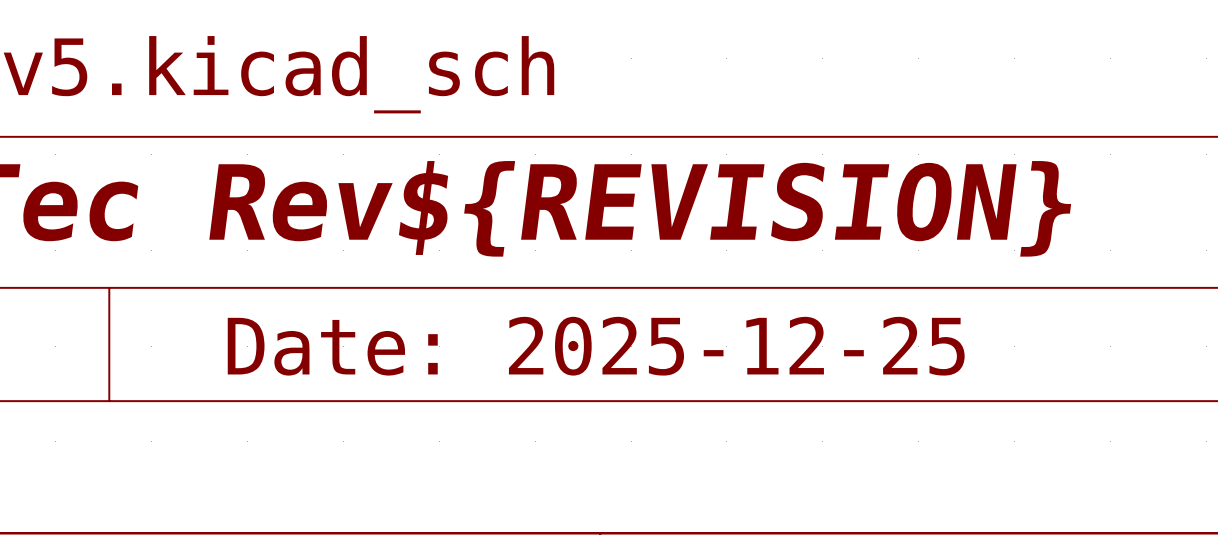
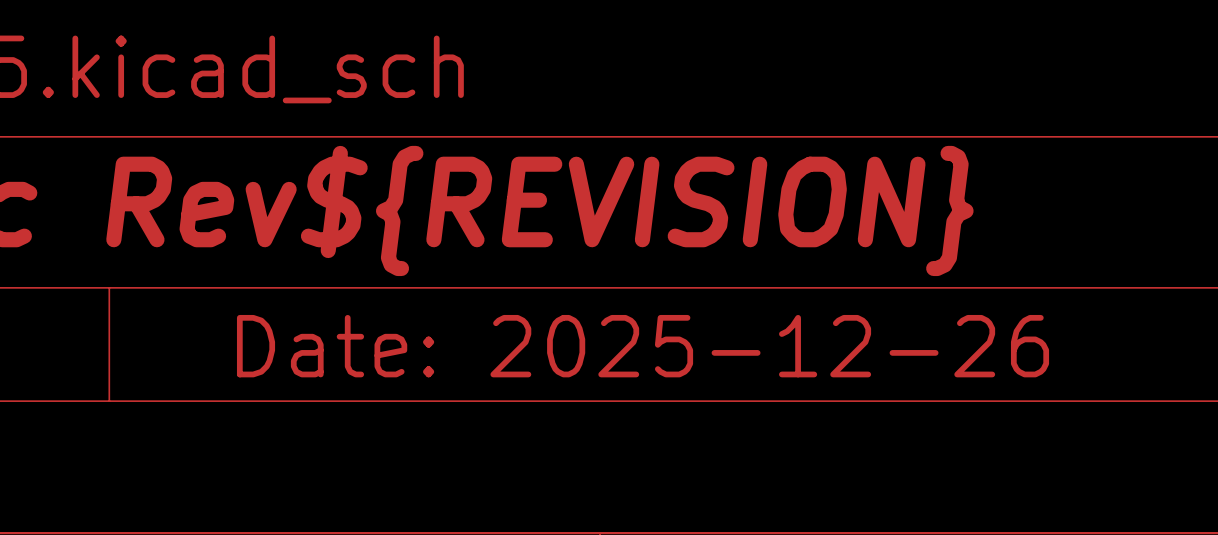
title block: Date: 2025-12-25 (596, 346) -> Date: 2025-12-26 (643, 346)

